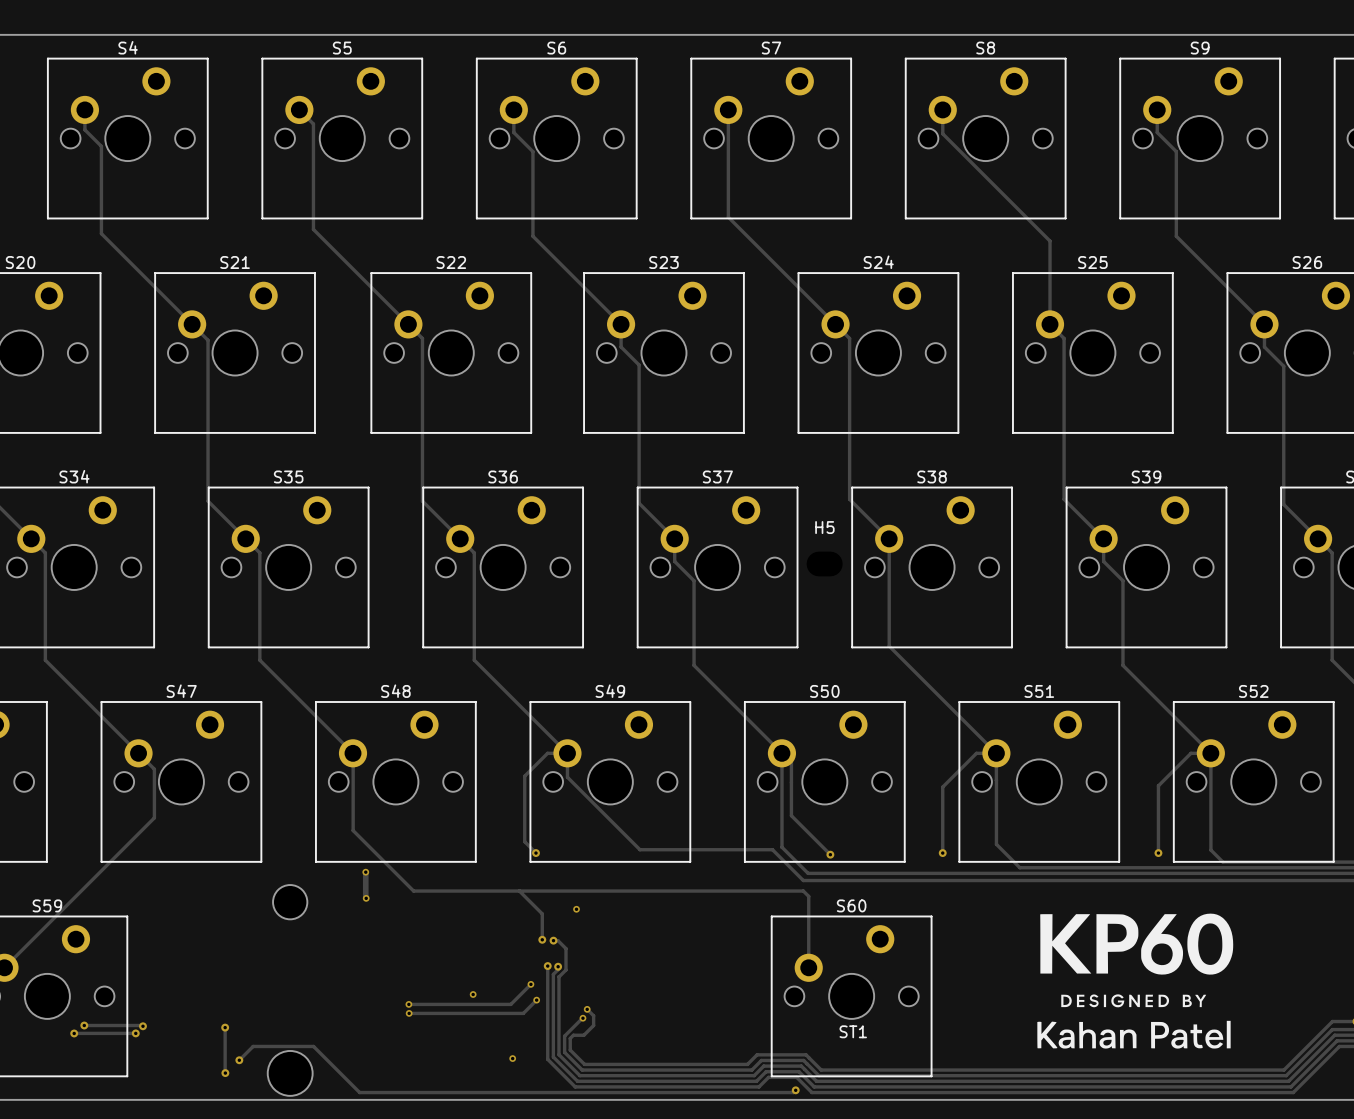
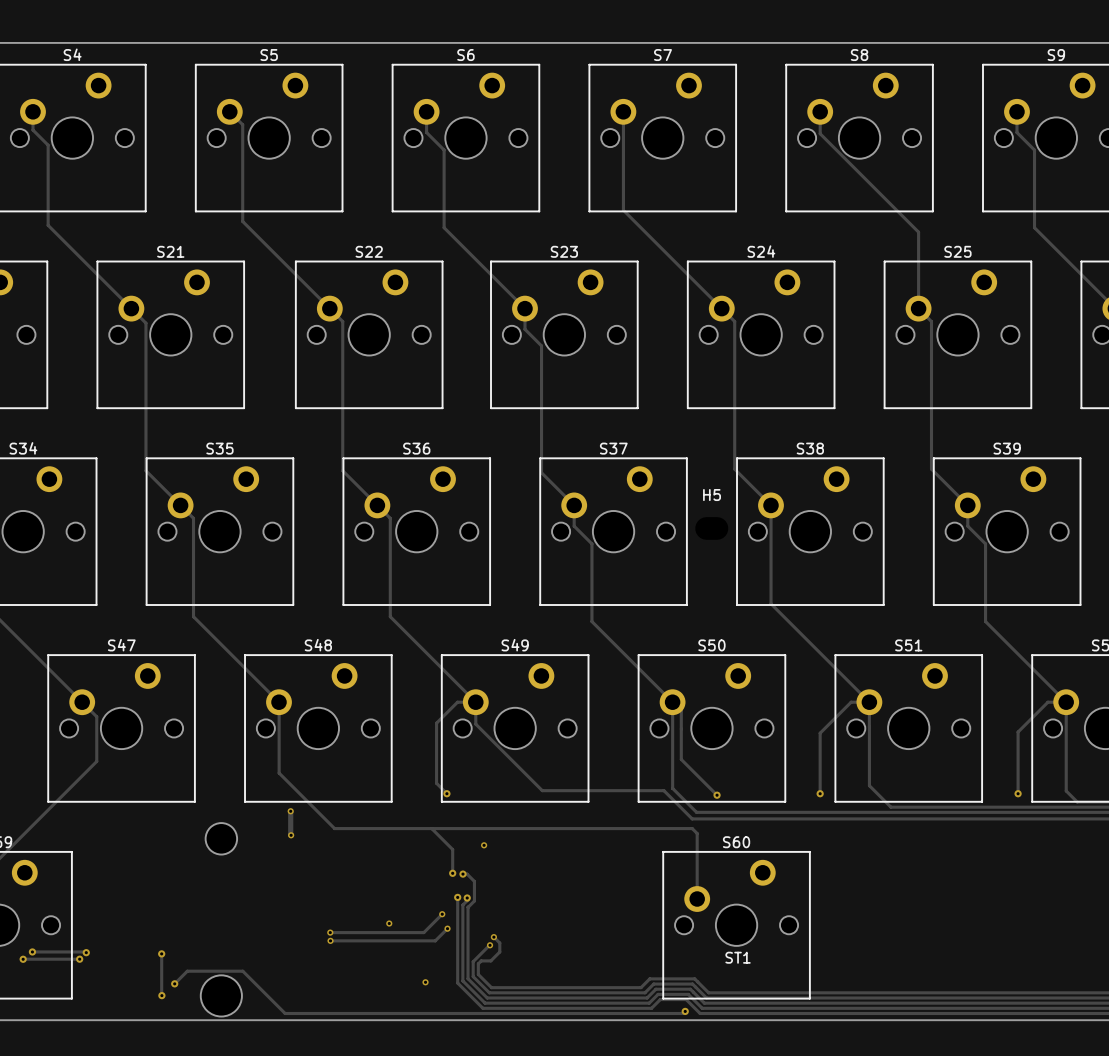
drawing: [1037, 913, 1234, 1049] -> none

